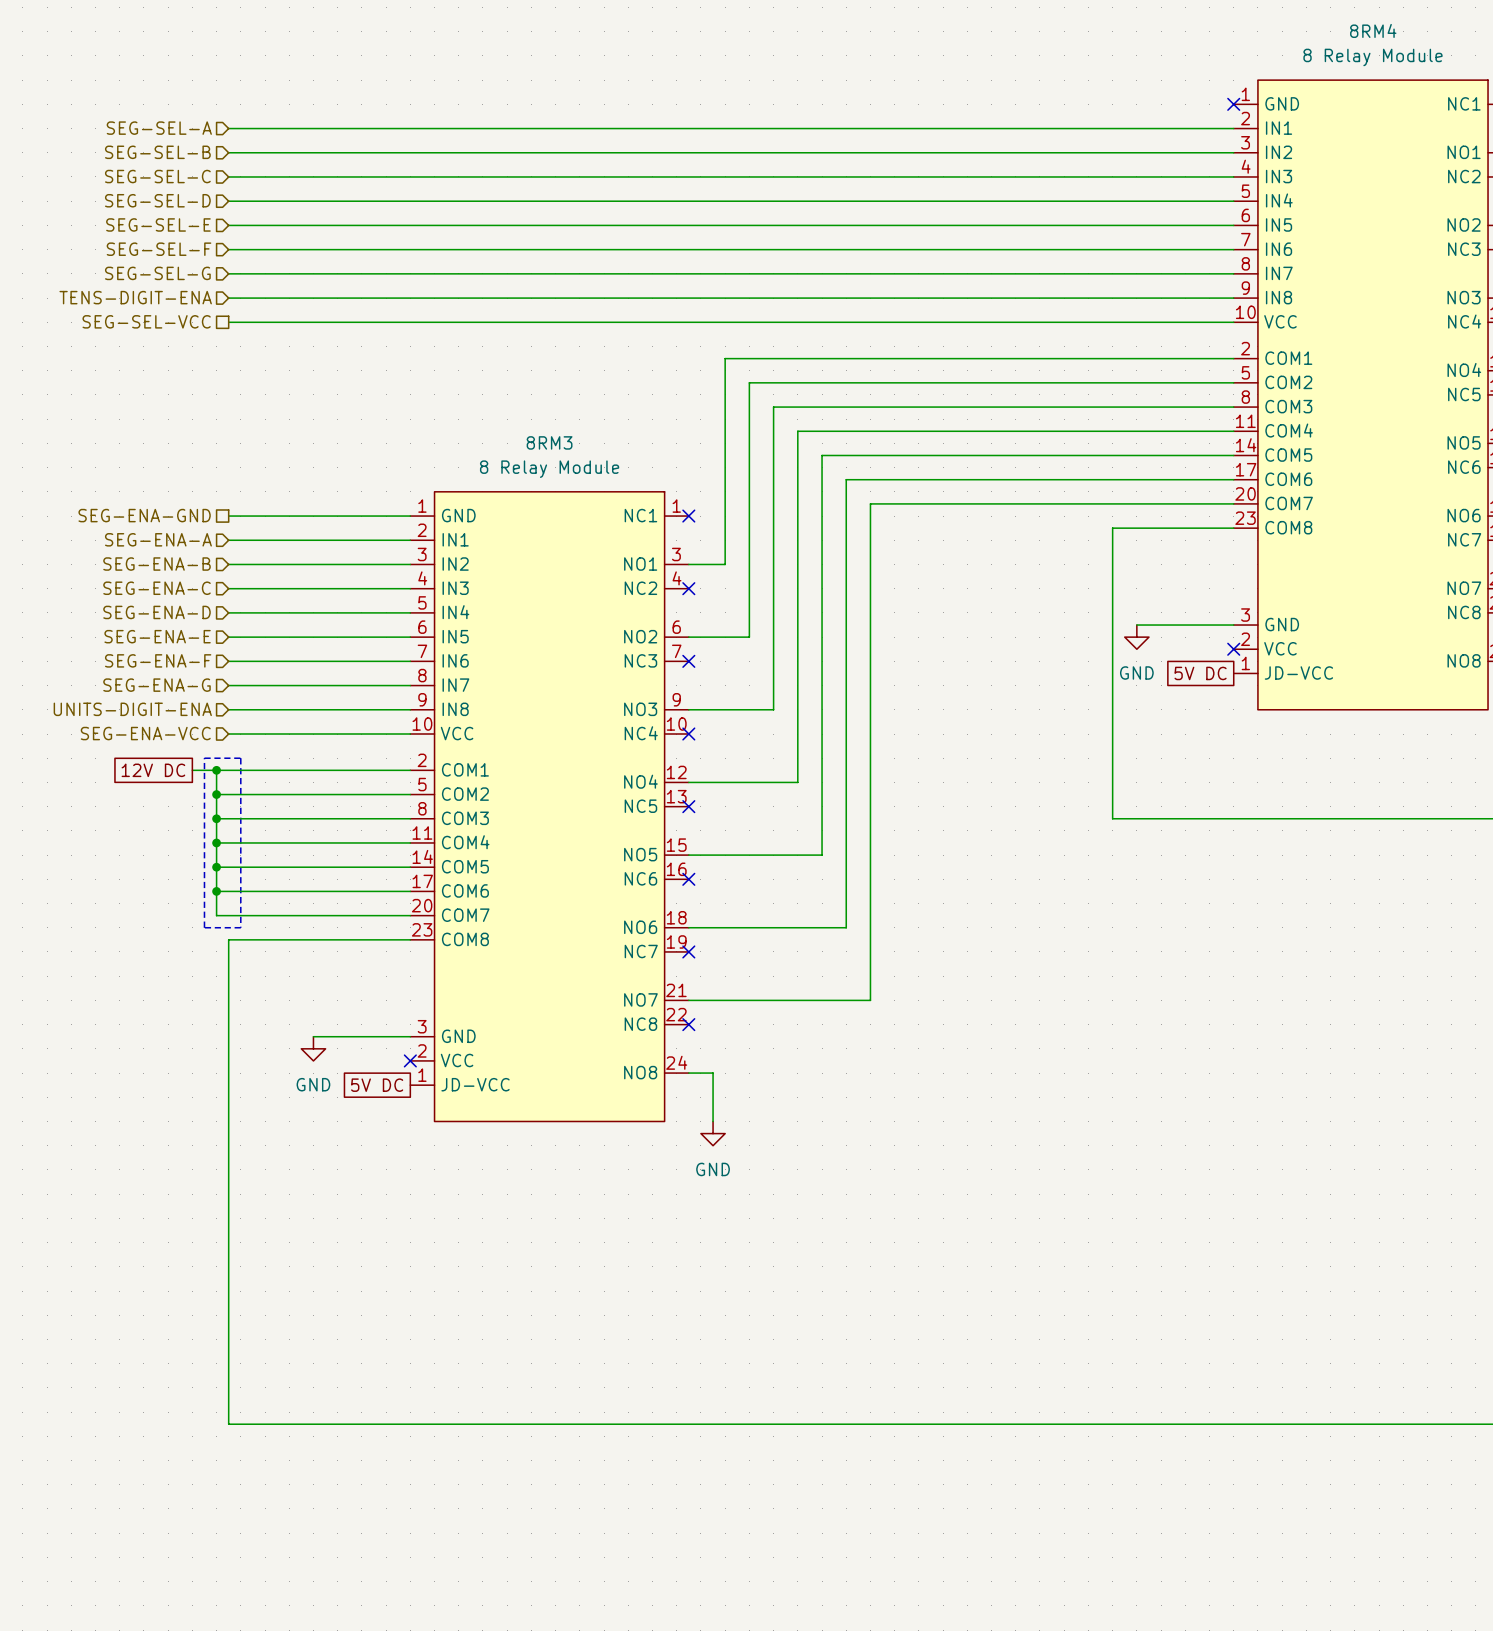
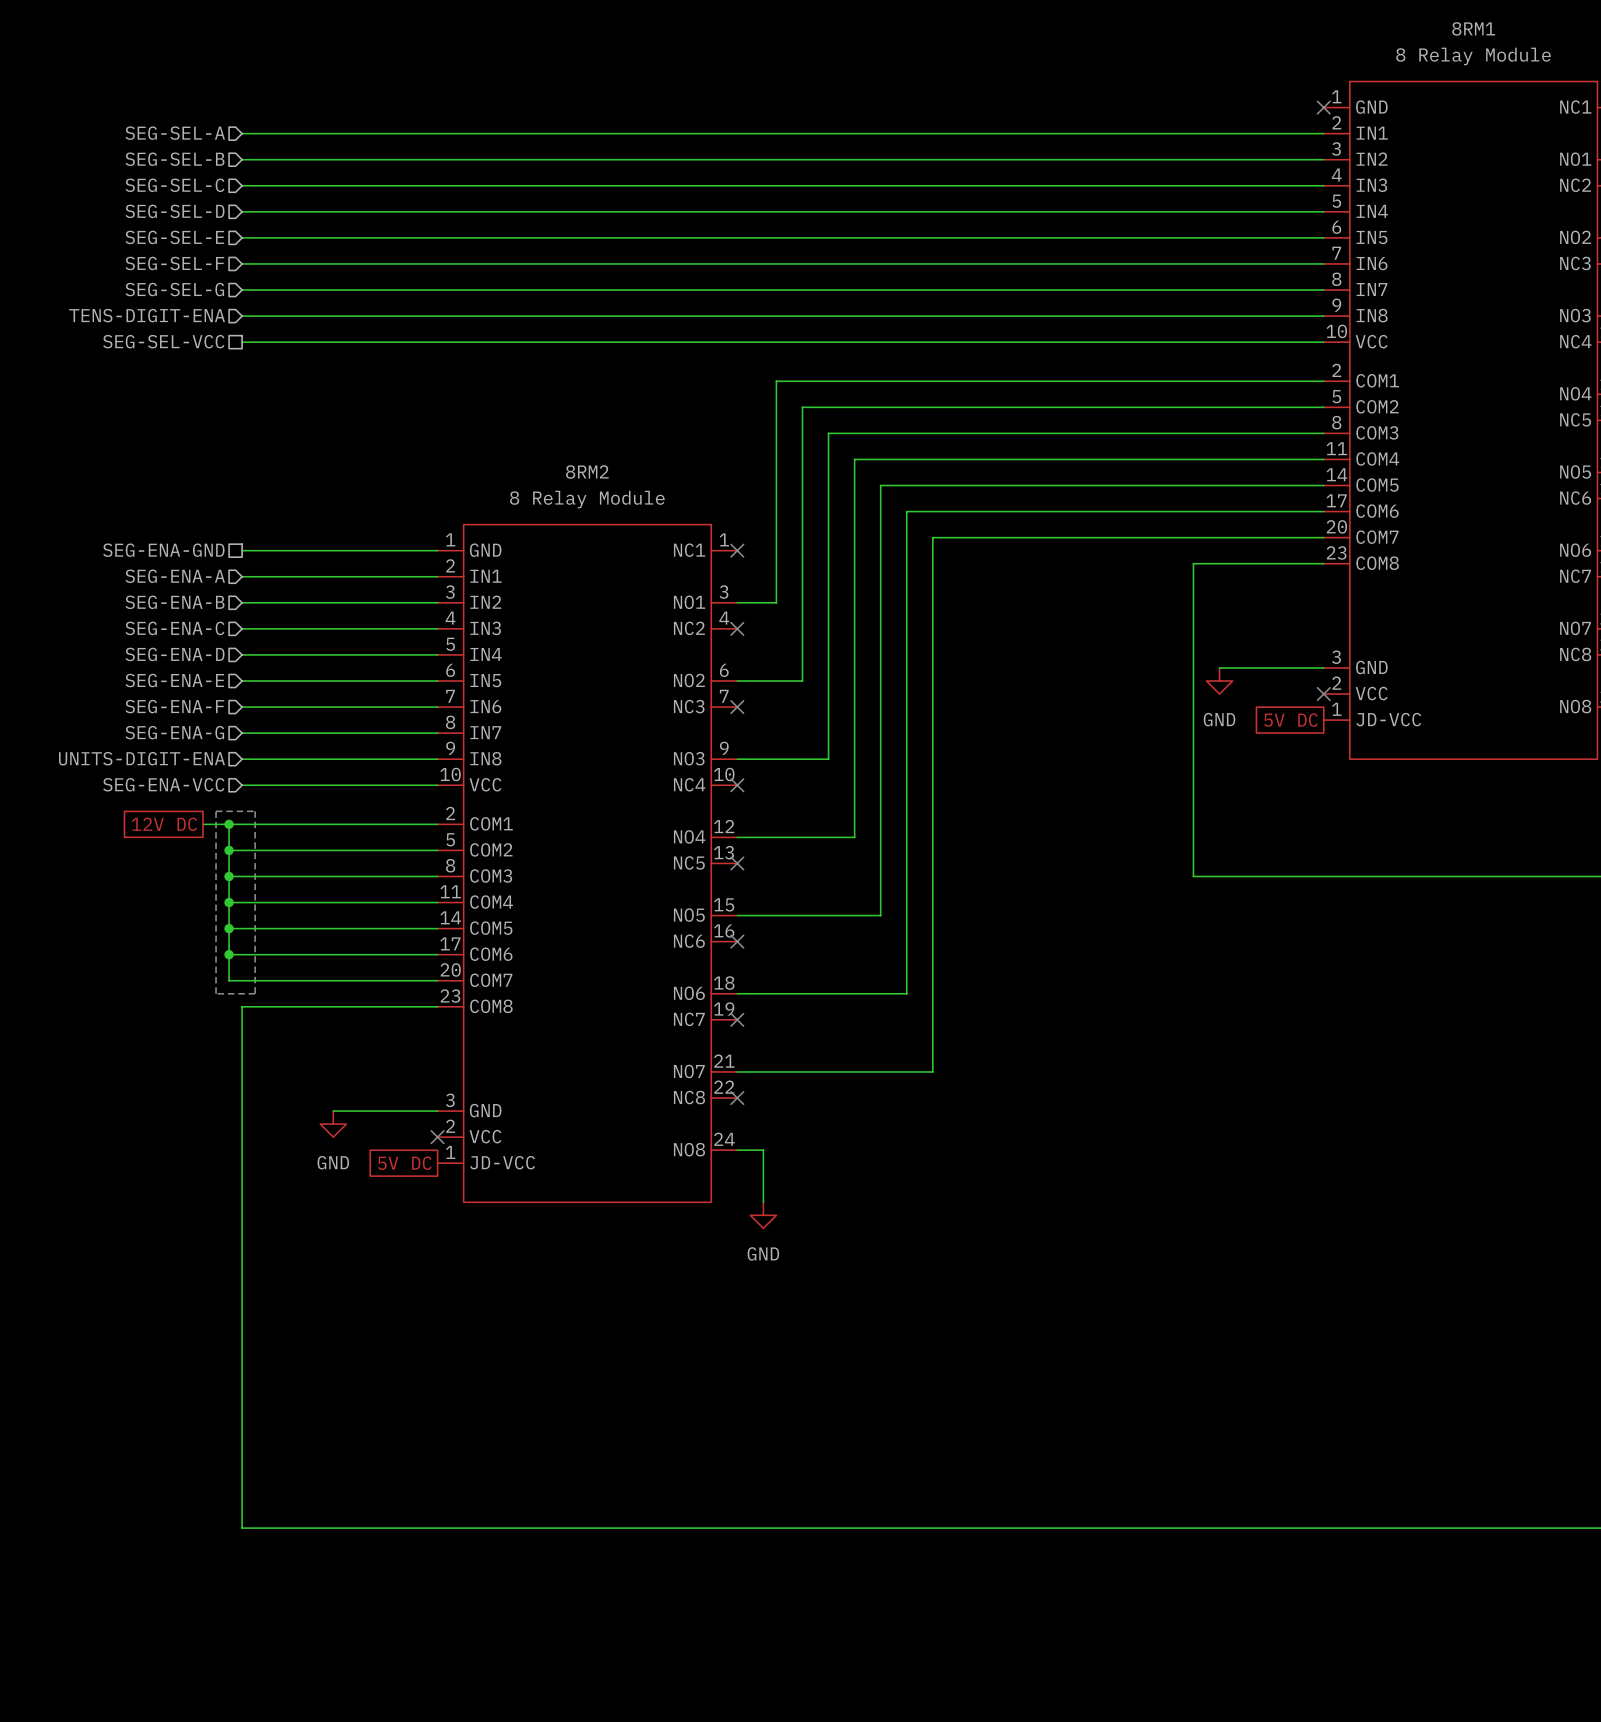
8RM4 name: 8RM4 (1373, 30) -> 8RM1 (1473, 28)
8RM3 name: 8RM3 (549, 442) -> 8RM2 (587, 471)

